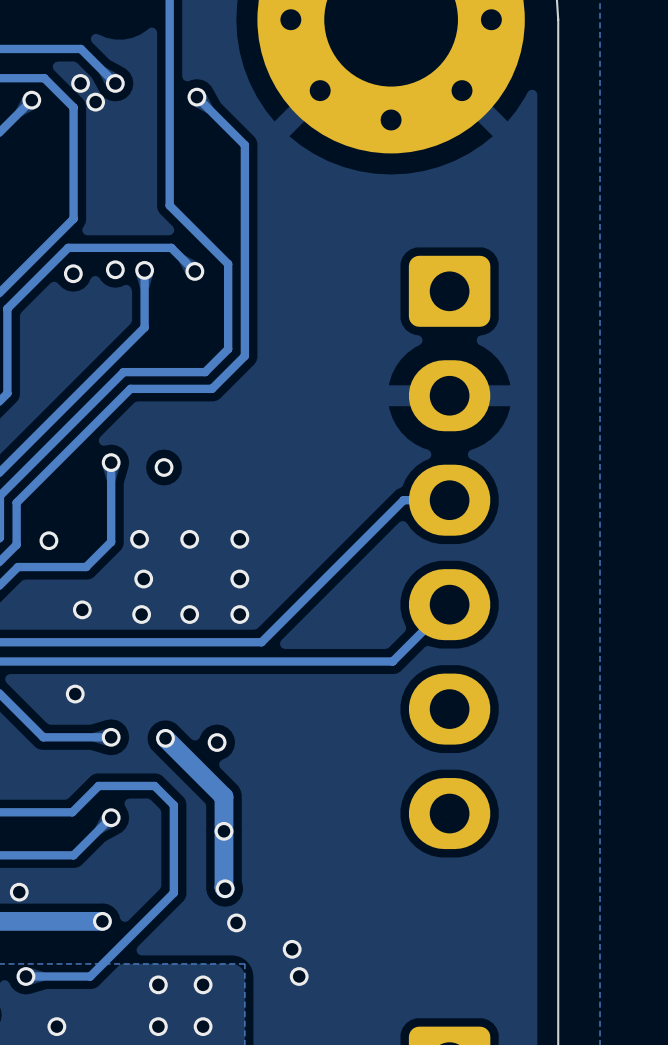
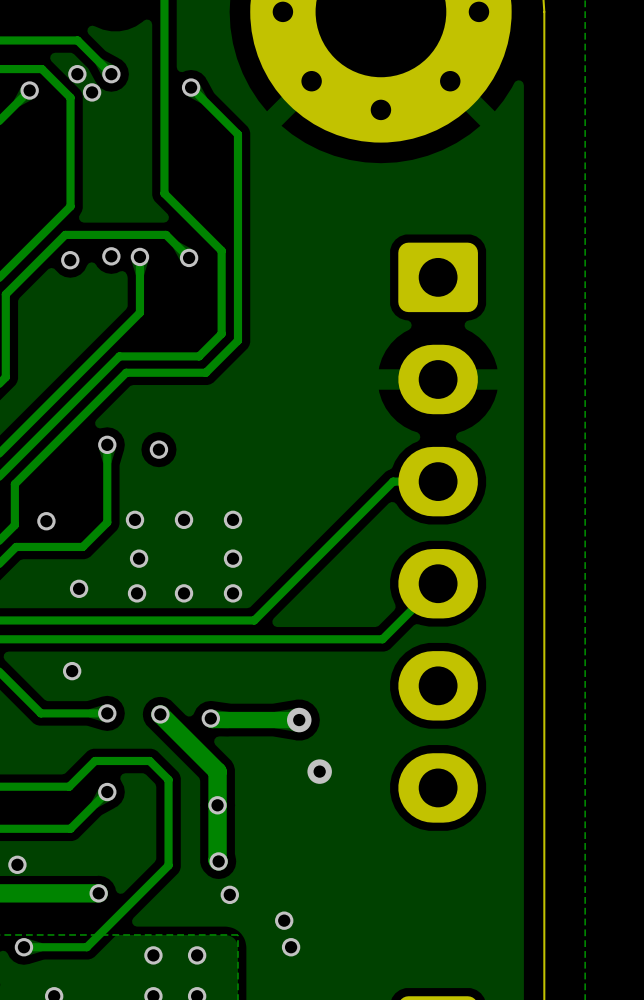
track: none -> (210, 718) (212, 720) (299, 720)
via: none -> (299, 720)
via: none -> (319, 771)

